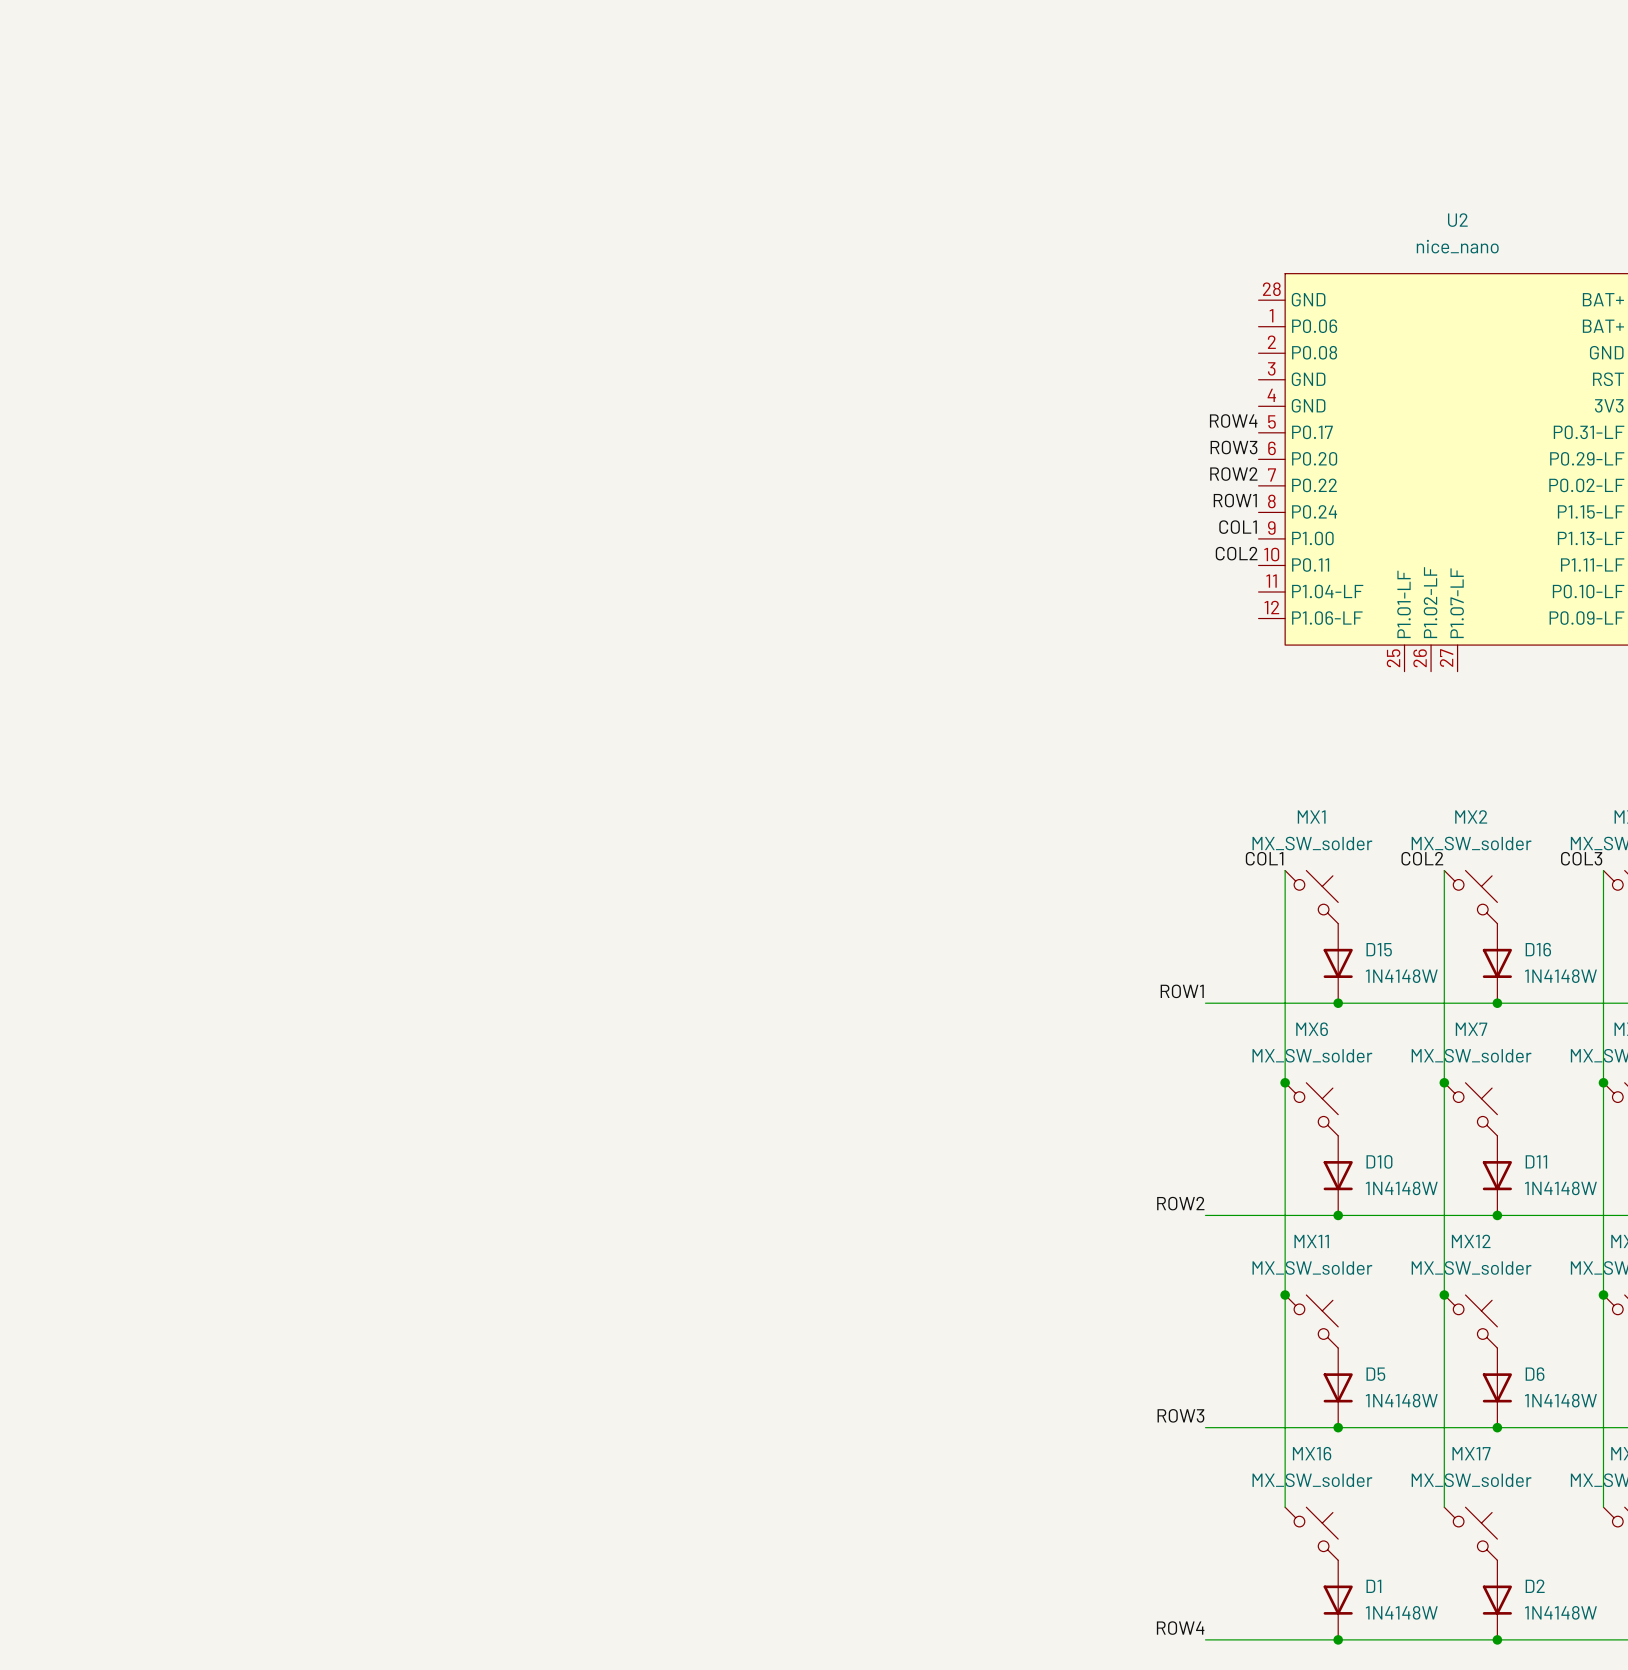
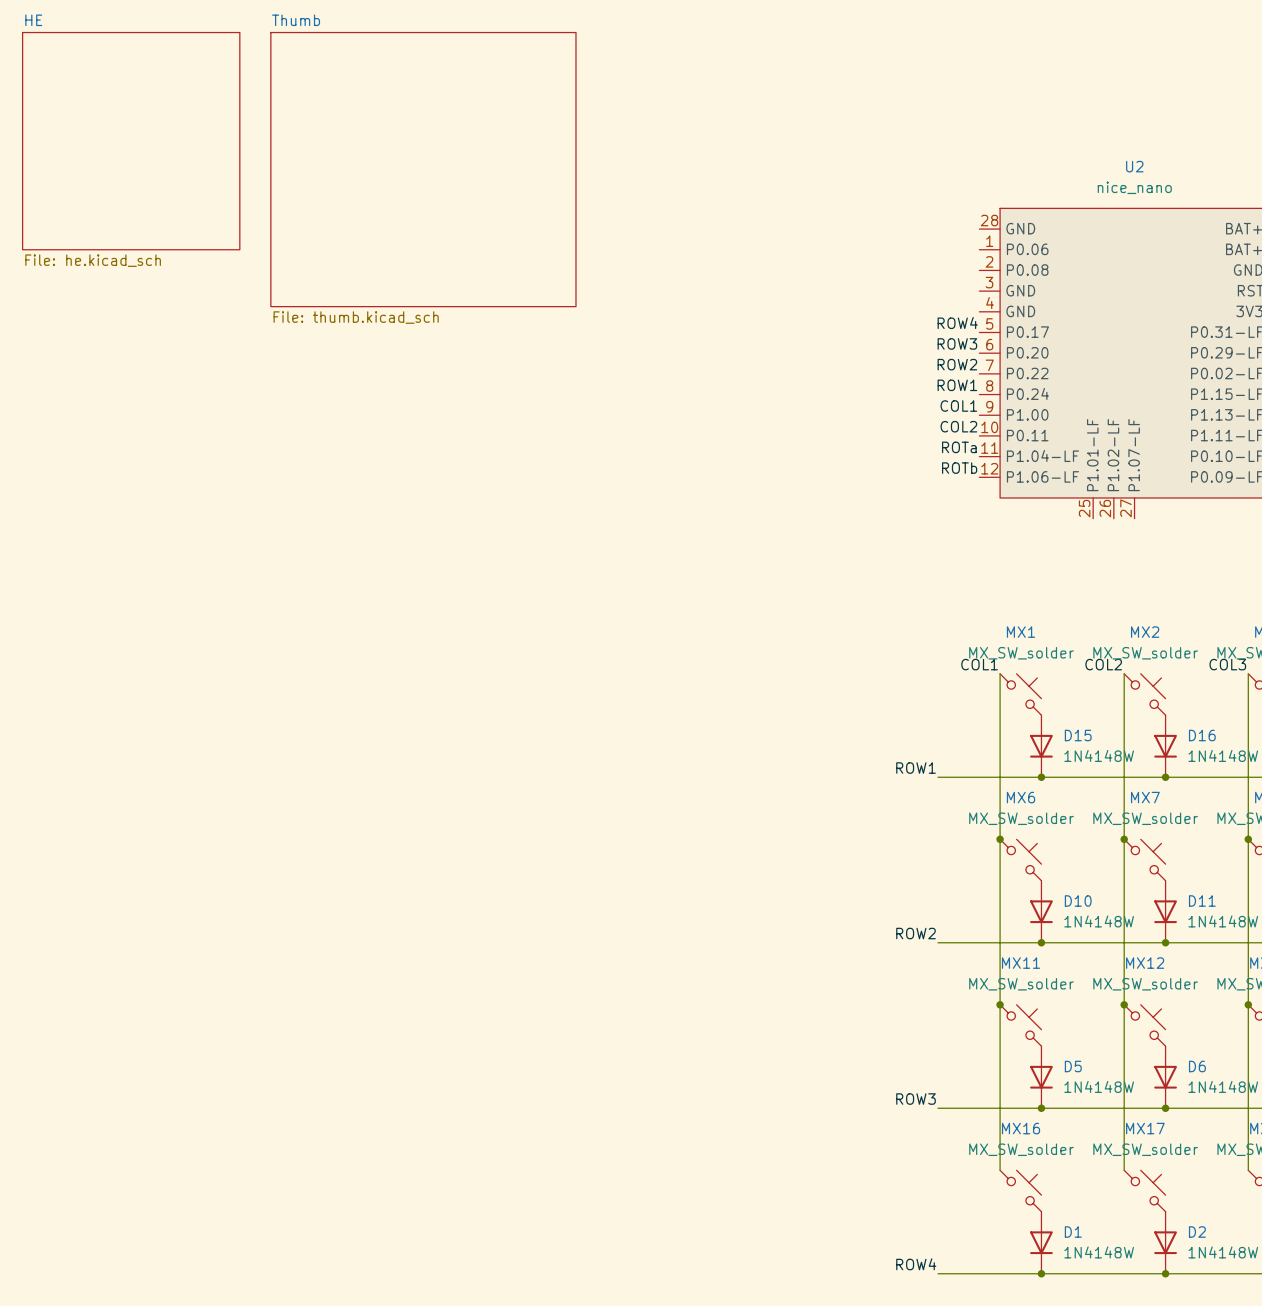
sheet HE: none -> File: he.kicad_sch (131, 141)
sheet Thumb: none -> File: thumb.kicad_sch (423, 169)
label: none -> ROTa (959, 447)
label: none -> ROTb (959, 468)

